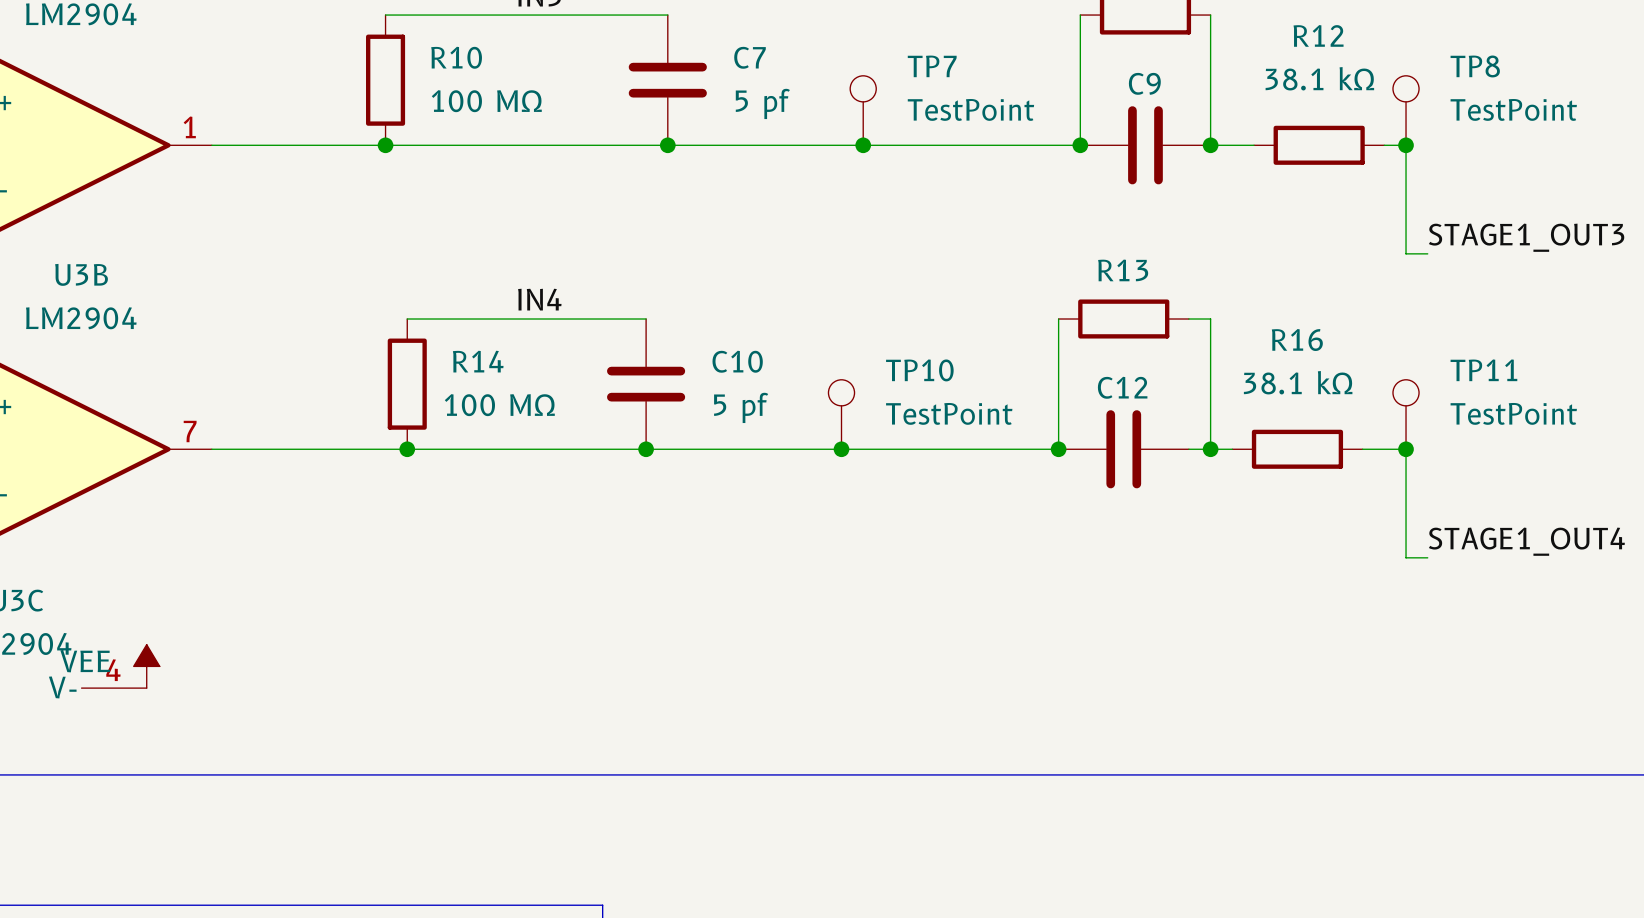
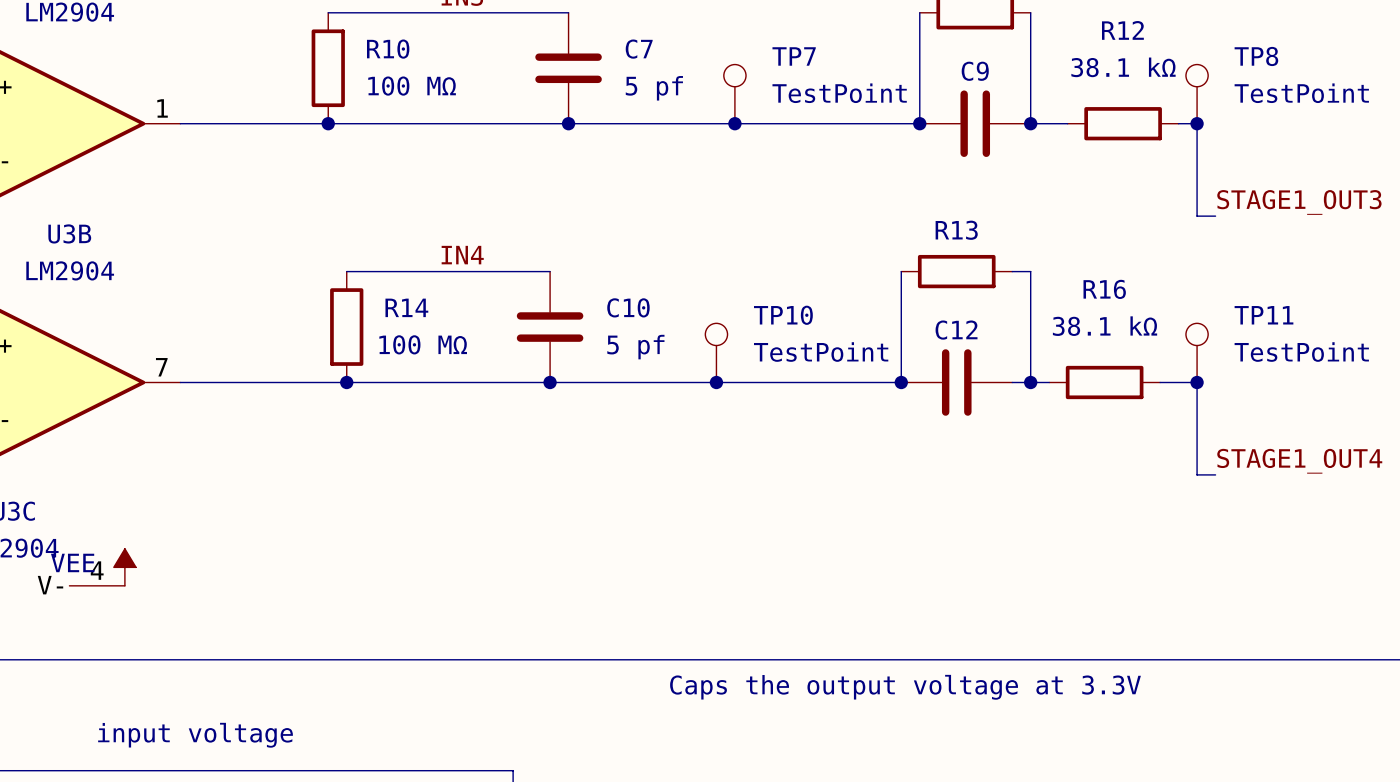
text: none -> Caps the output voltage at 3.3V (905, 687)
text: none -> input voltage (195, 735)

